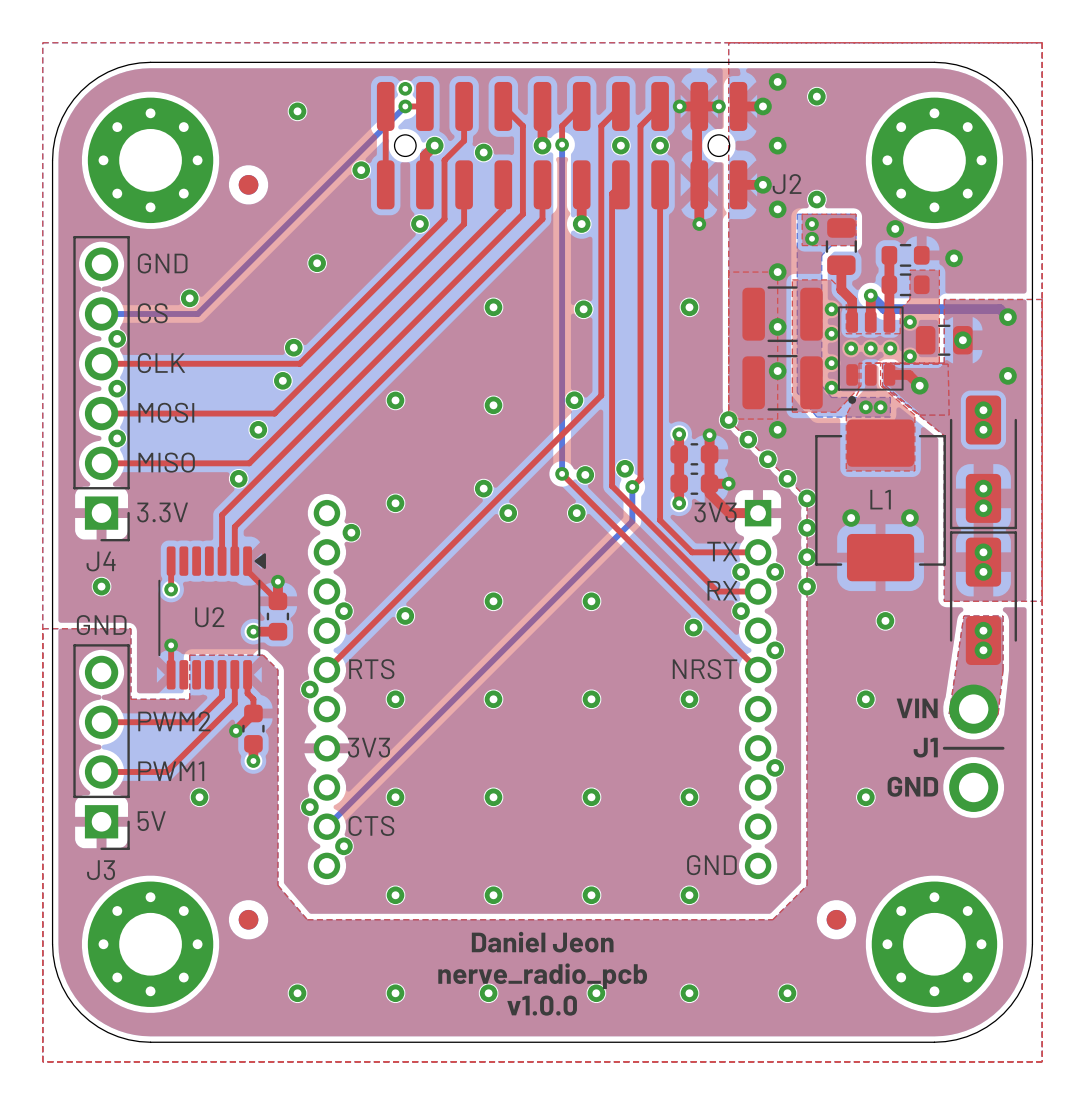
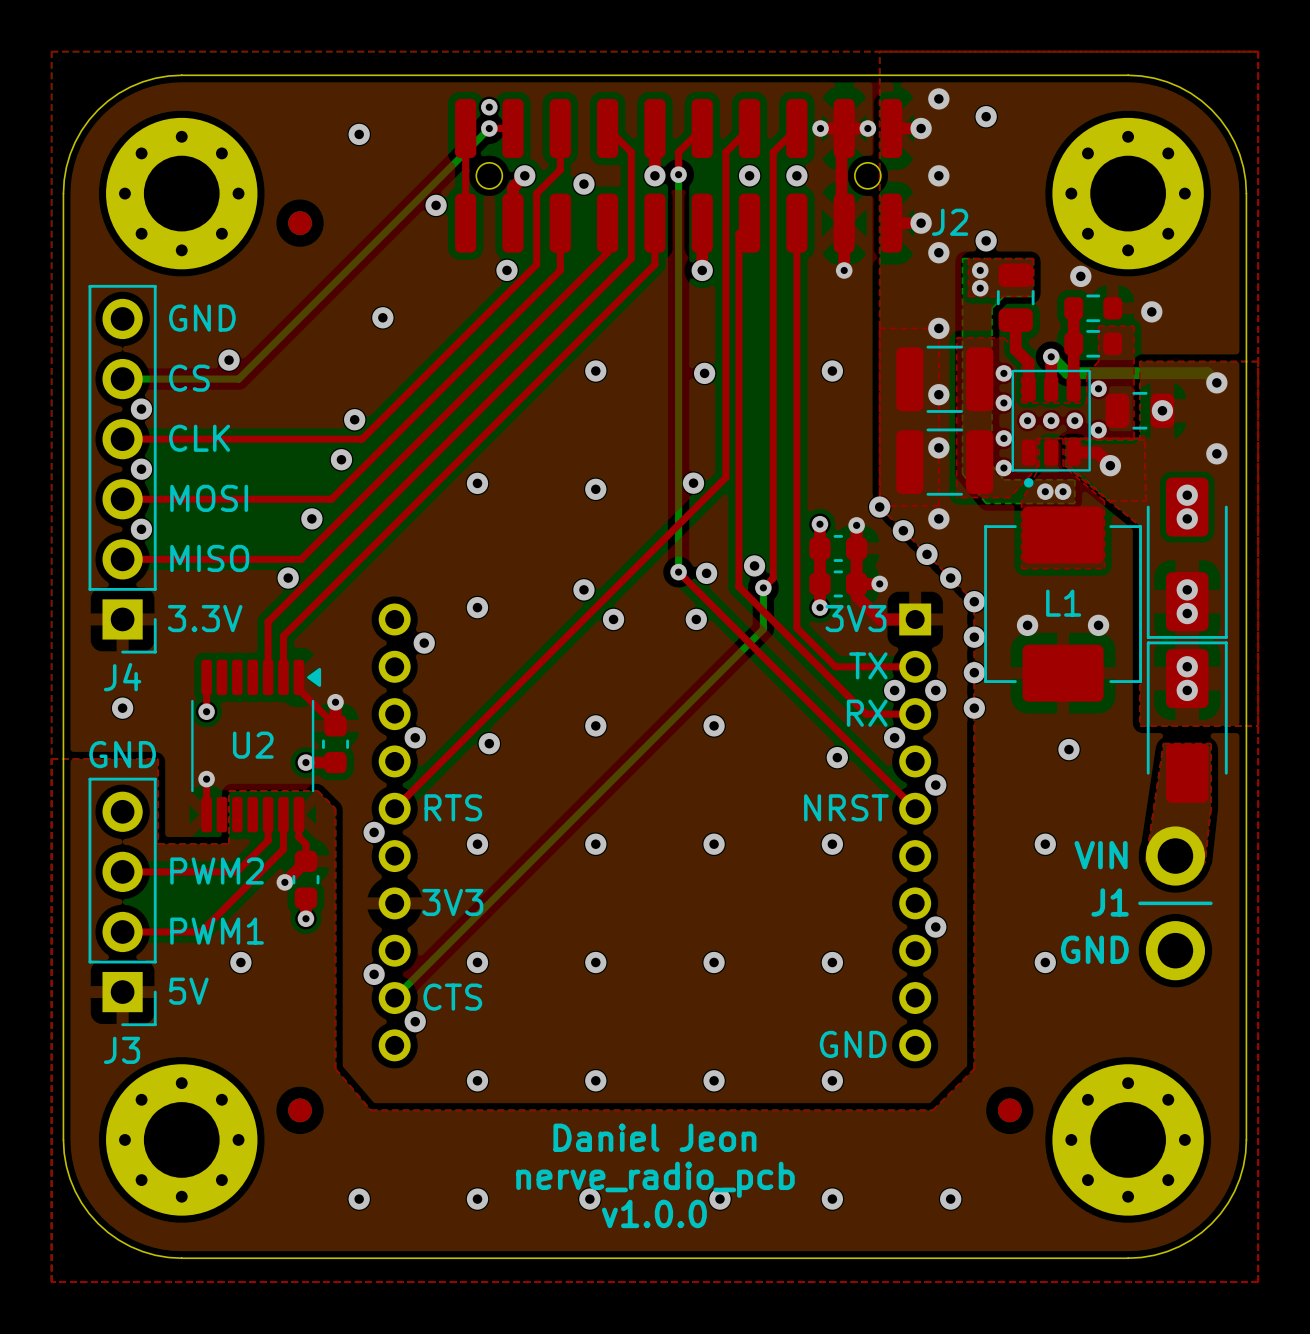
via: (983, 630) -> none
via: (983, 650) -> none

